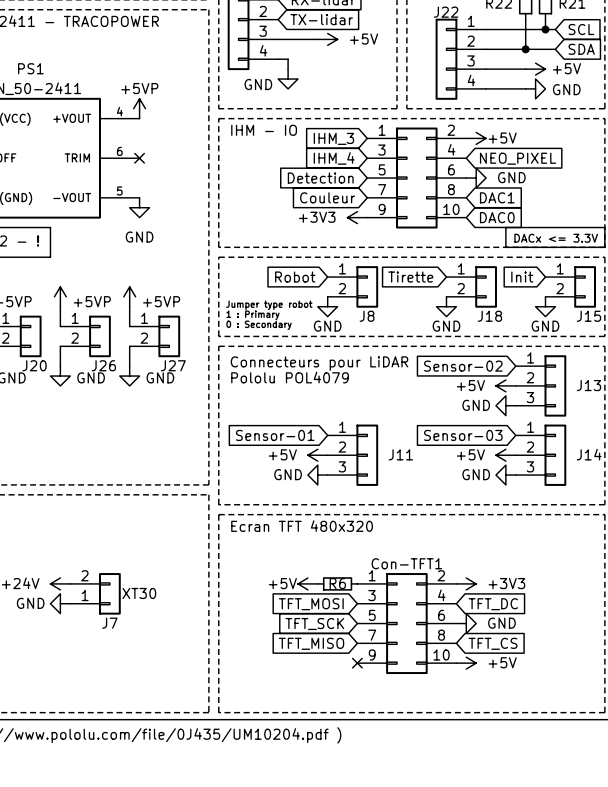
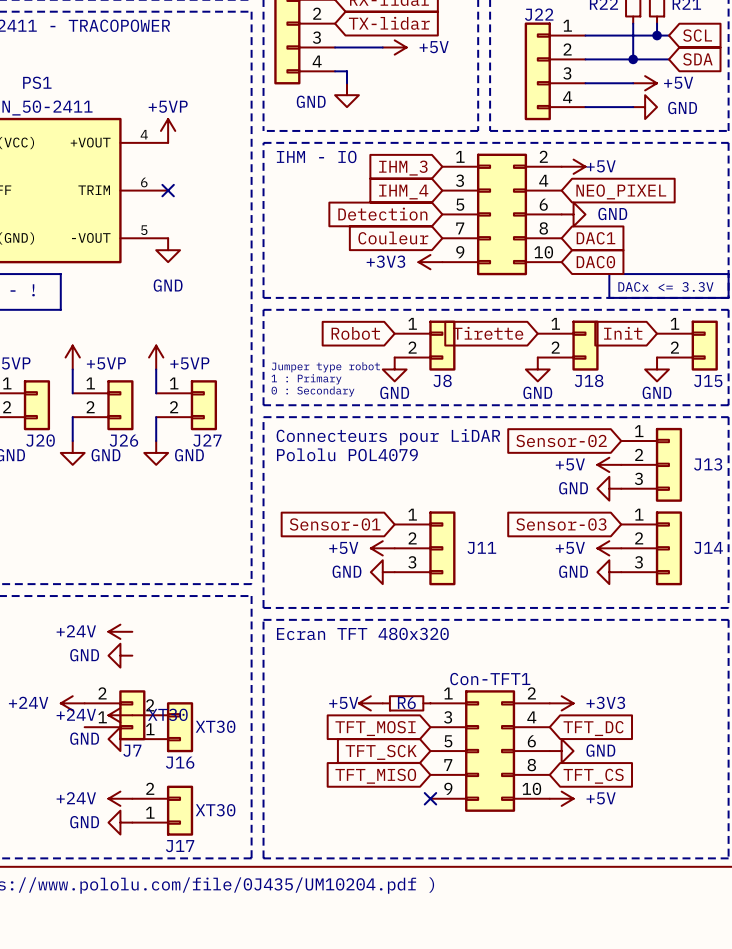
power symbol: none -> +24V (120, 631)
power symbol: none -> GND (120, 655)
power symbol: none -> +24V (120, 715)
power symbol: GND (60, 603) -> none
J16: none -> XT30 (162, 727)
power symbol: none -> GND (120, 739)
power symbol: none -> +24V (120, 798)
J17: none -> XT30 (162, 810)
power symbol: none -> GND (120, 822)

